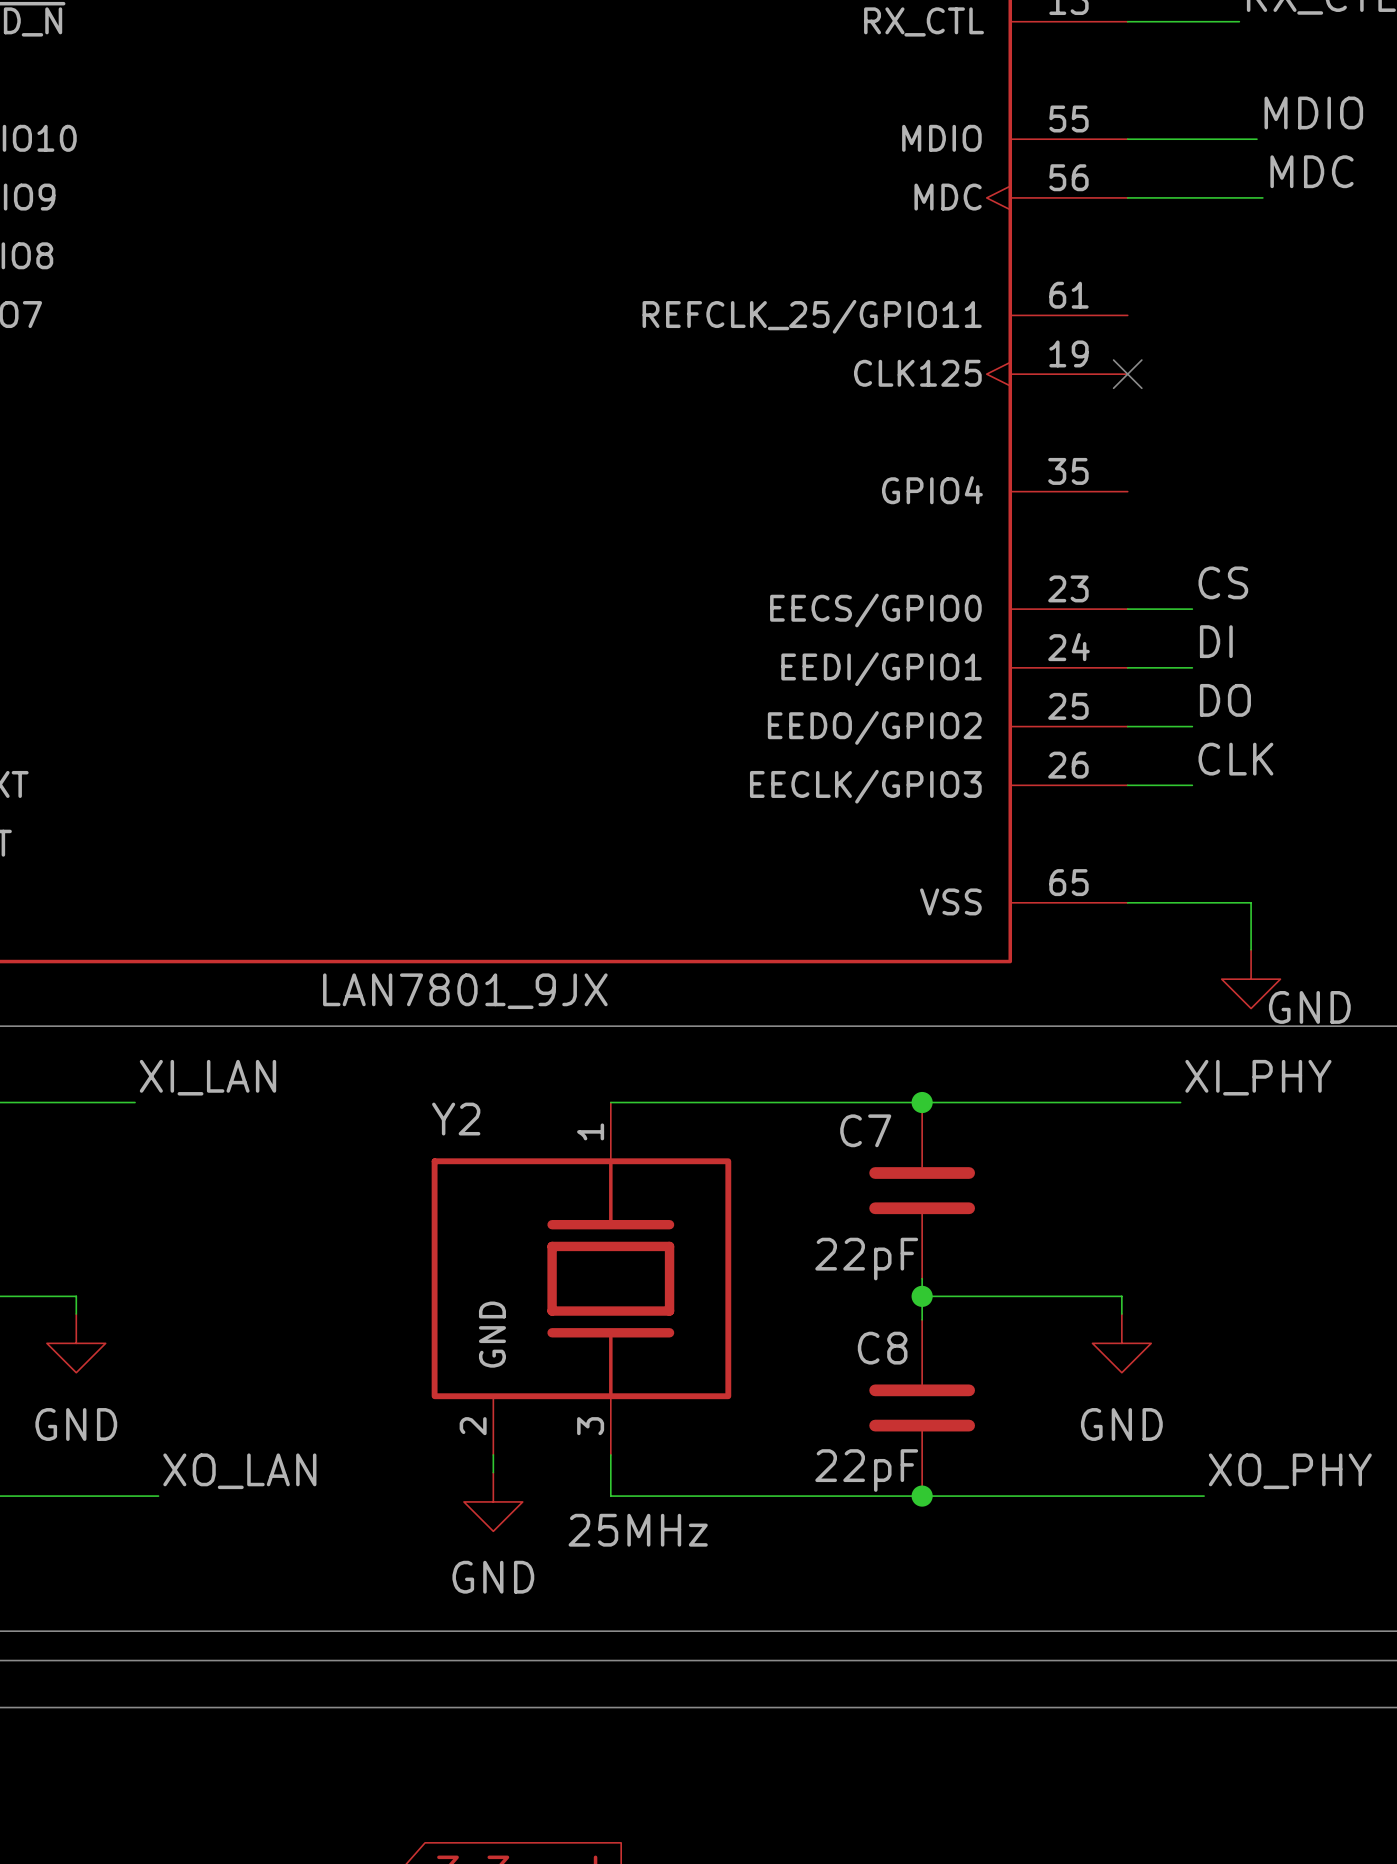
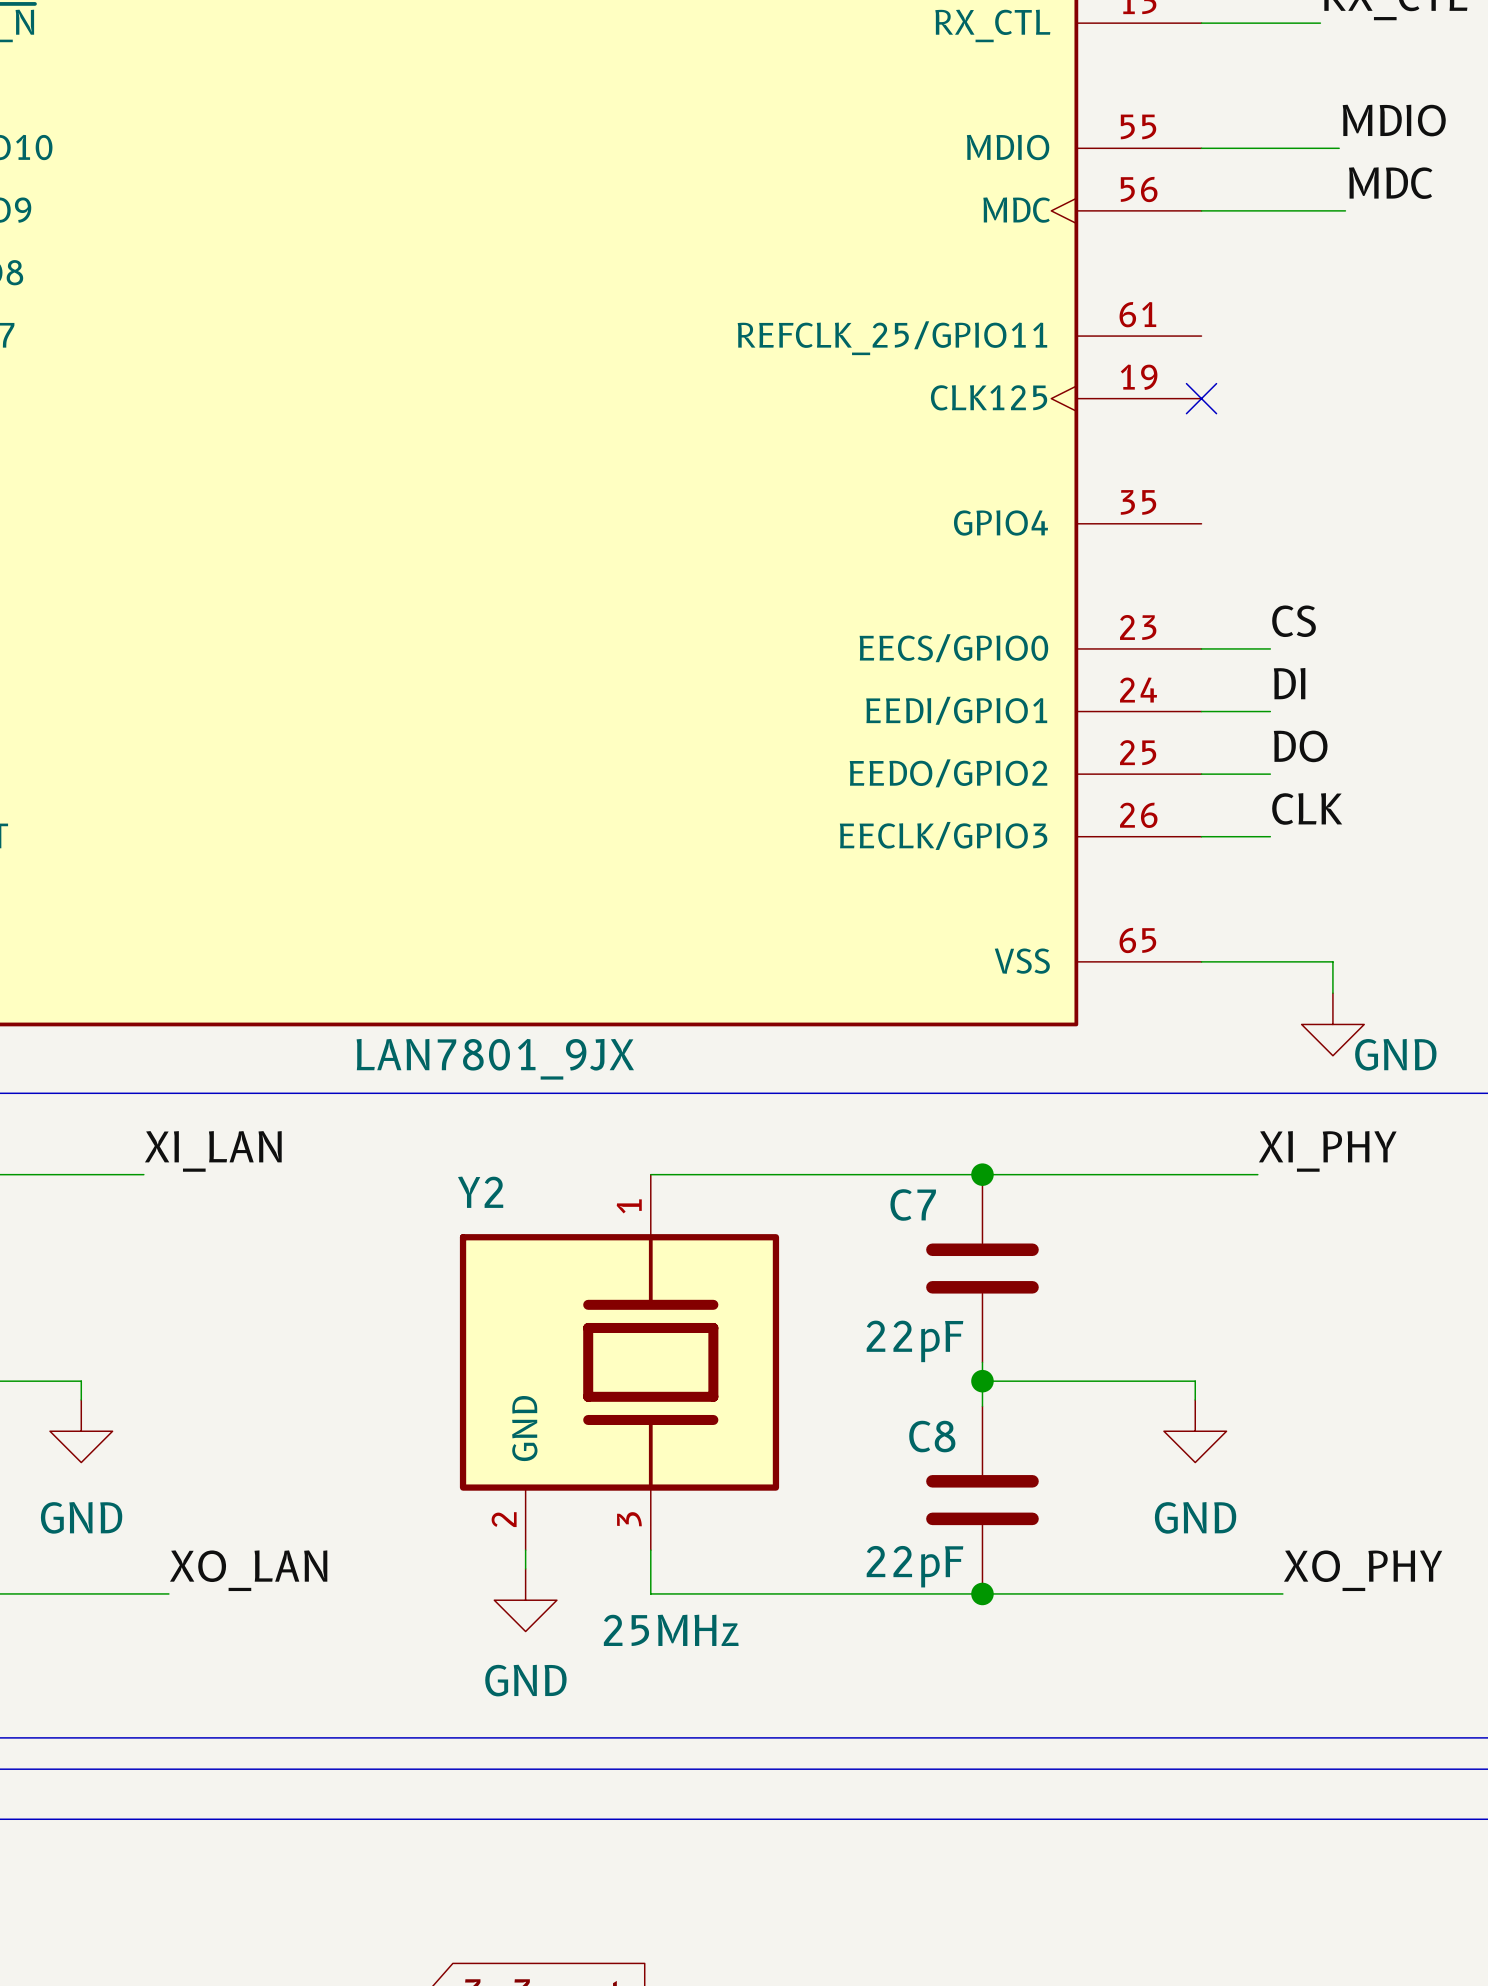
power symbol position: GND (1251, 979) -> GND (1332, 1024)

